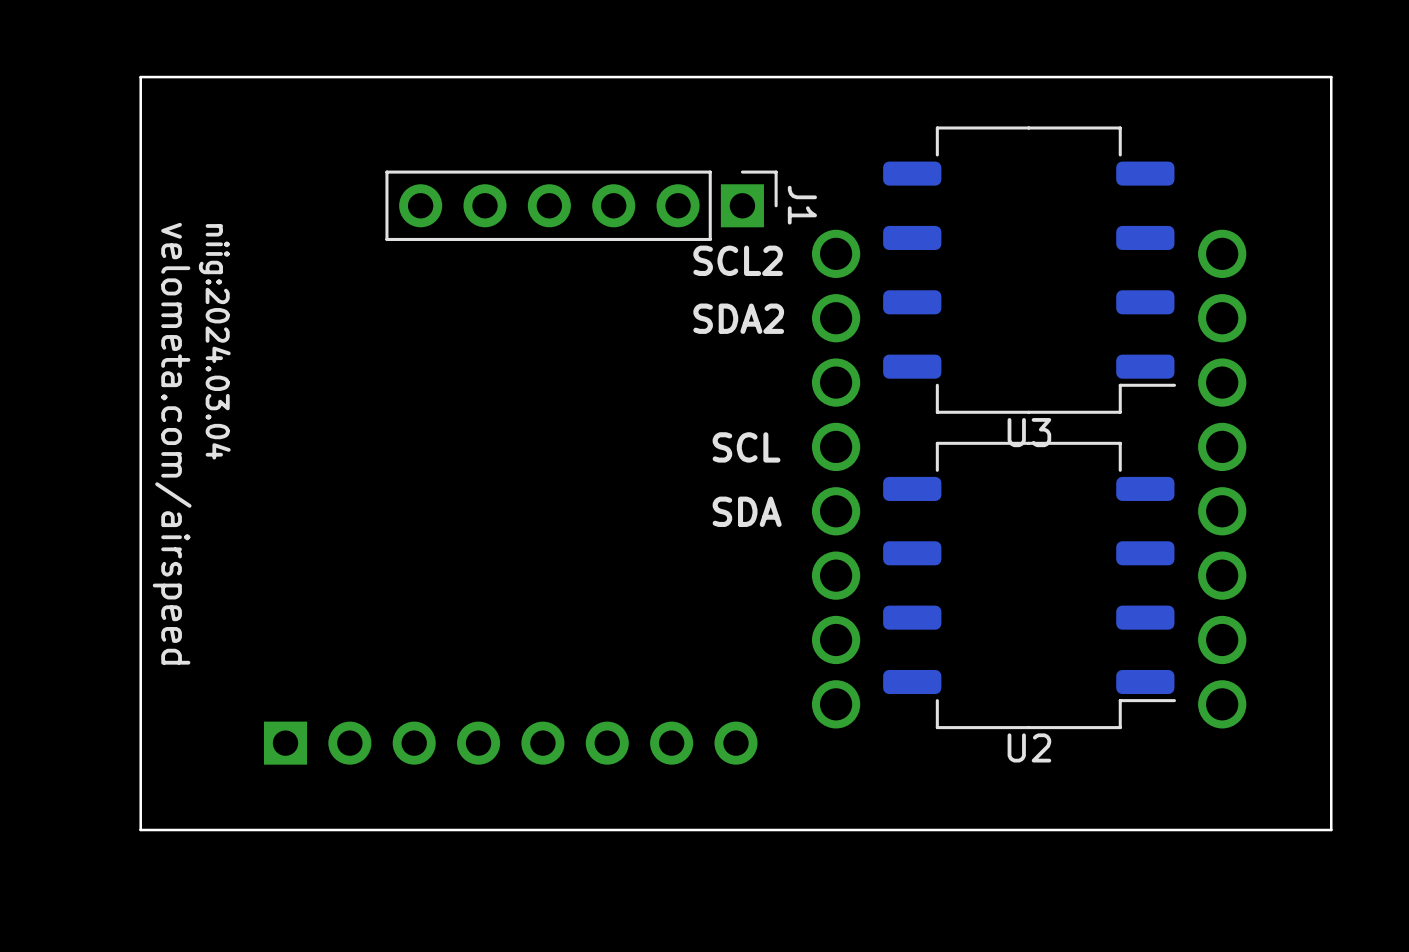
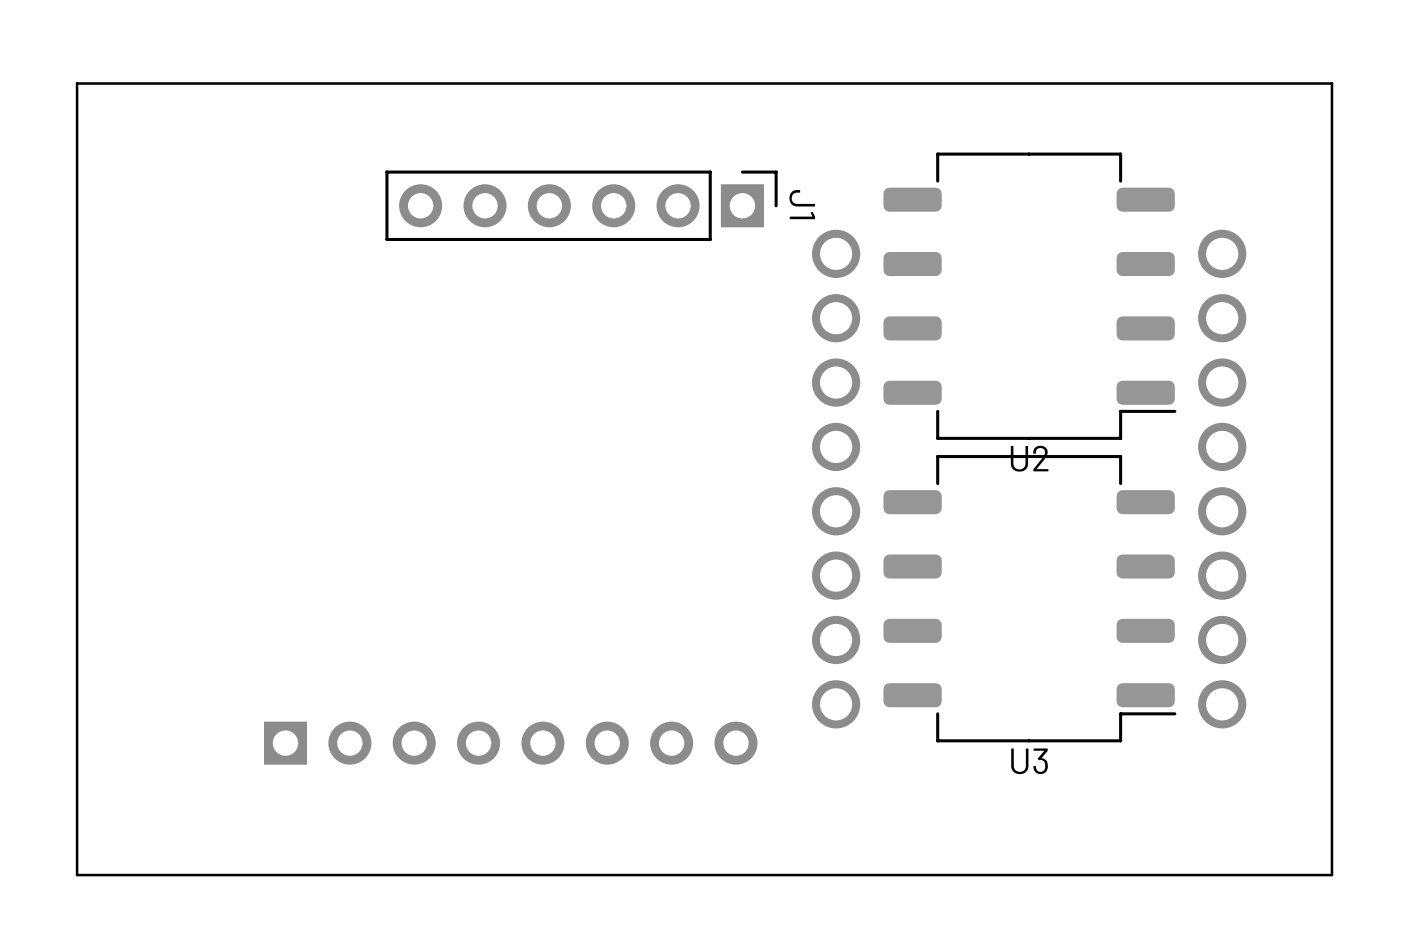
board edge: (1331, 77) (140, 77) (140, 830) (1331, 830) (1331, 77) -> (1331, 83) (1331, 875) (77, 875) (77, 83) (1331, 83)
text: SCL2 (738, 260) -> none
U3 position: (1029, 270) -> (1029, 598)
text: SDA2 (738, 318) -> none
text: niig:2024.03.04 (214, 341) -> none
text: velometa.com/airspeed (172, 443) -> none
text: SCL (746, 447) -> none
text: SDA (747, 511) -> none
U2 position: (1029, 585) -> (1029, 296)

